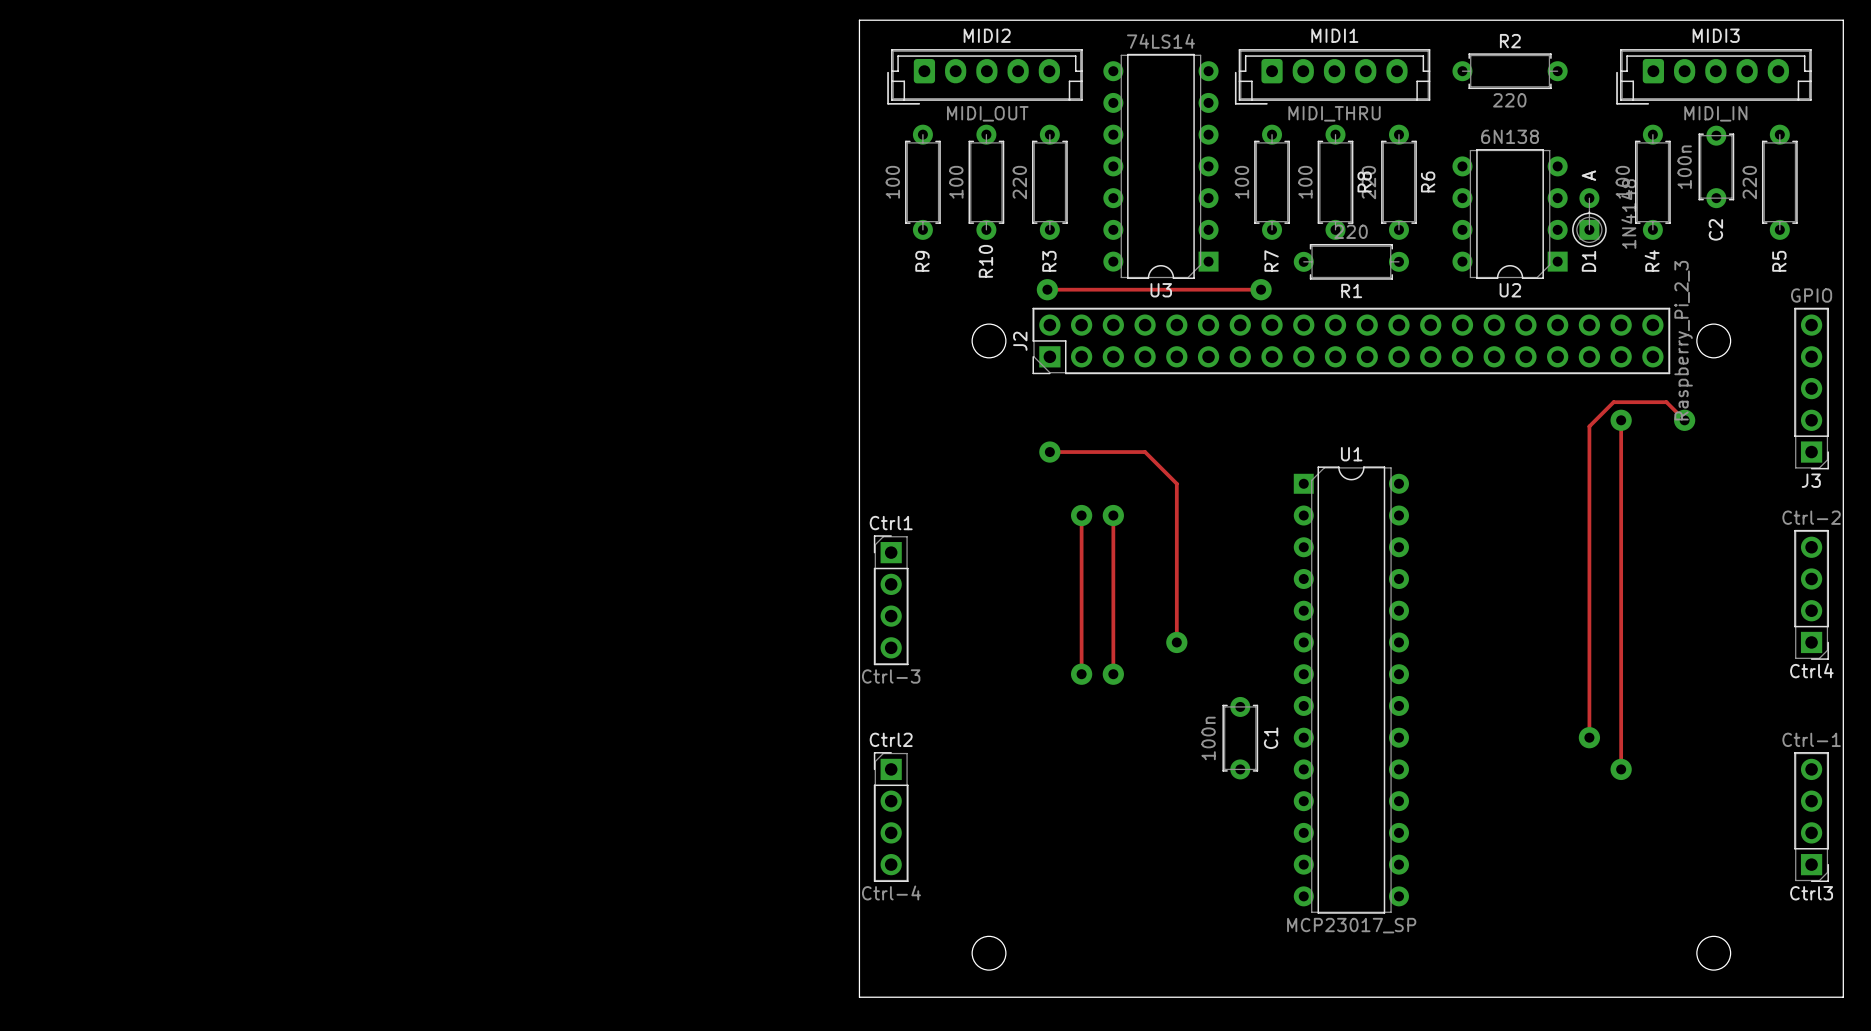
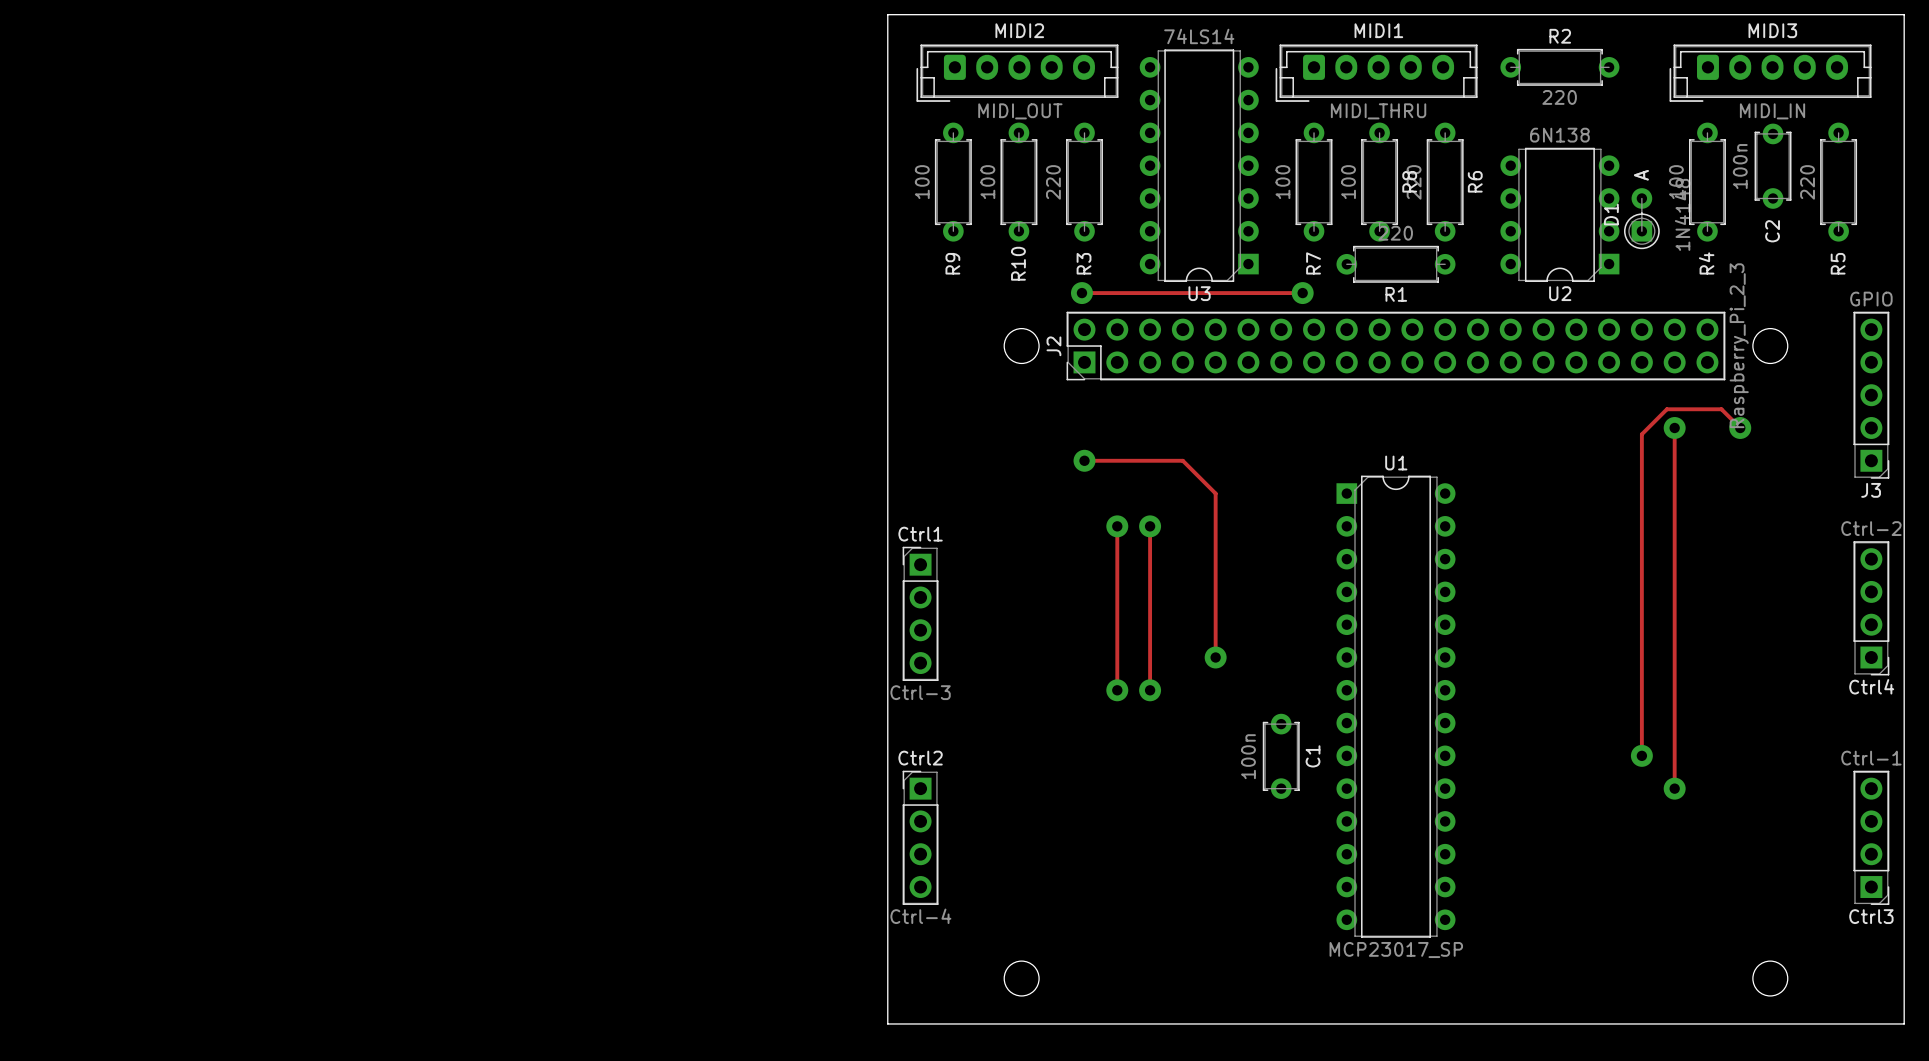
D1 name position: D1 (1588, 261) -> D1 (1611, 214)

